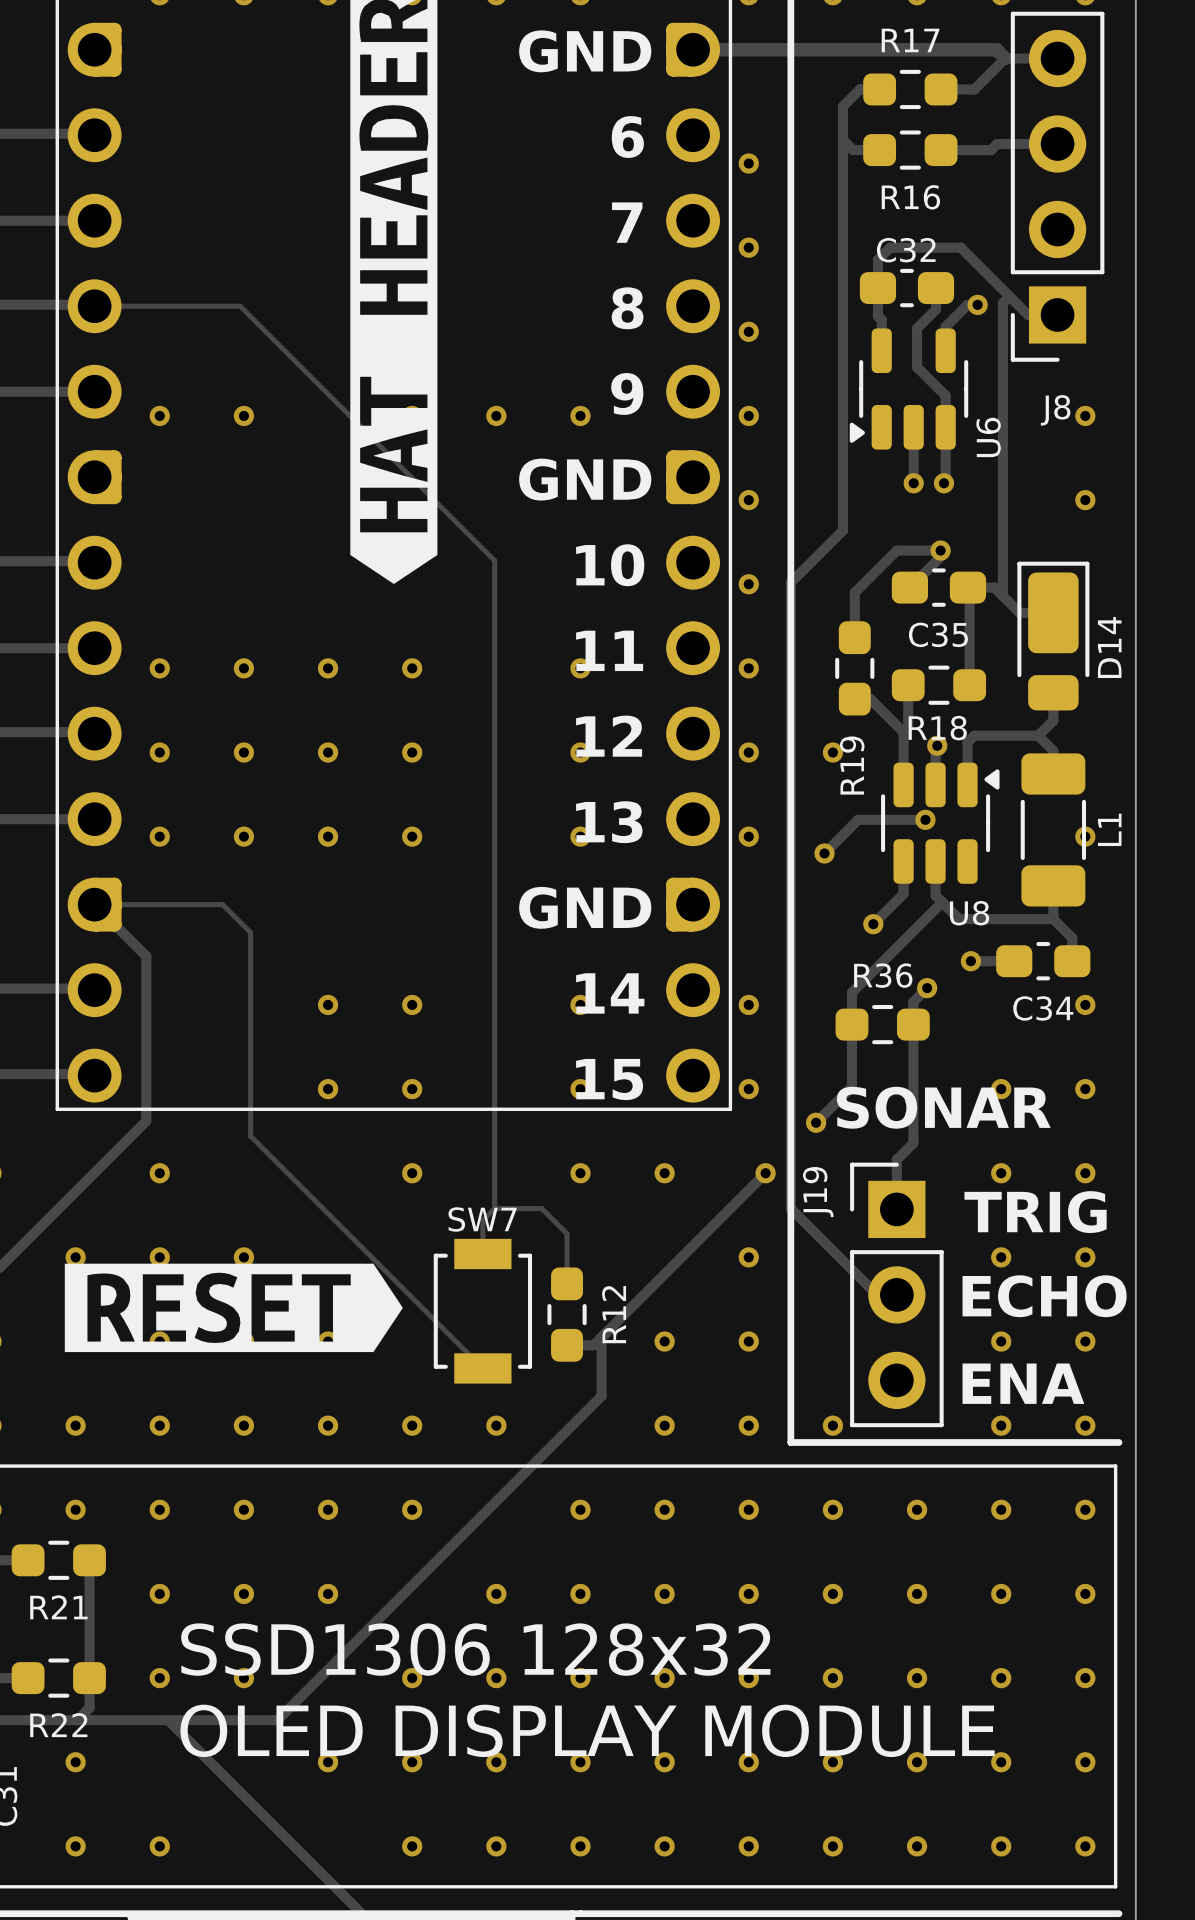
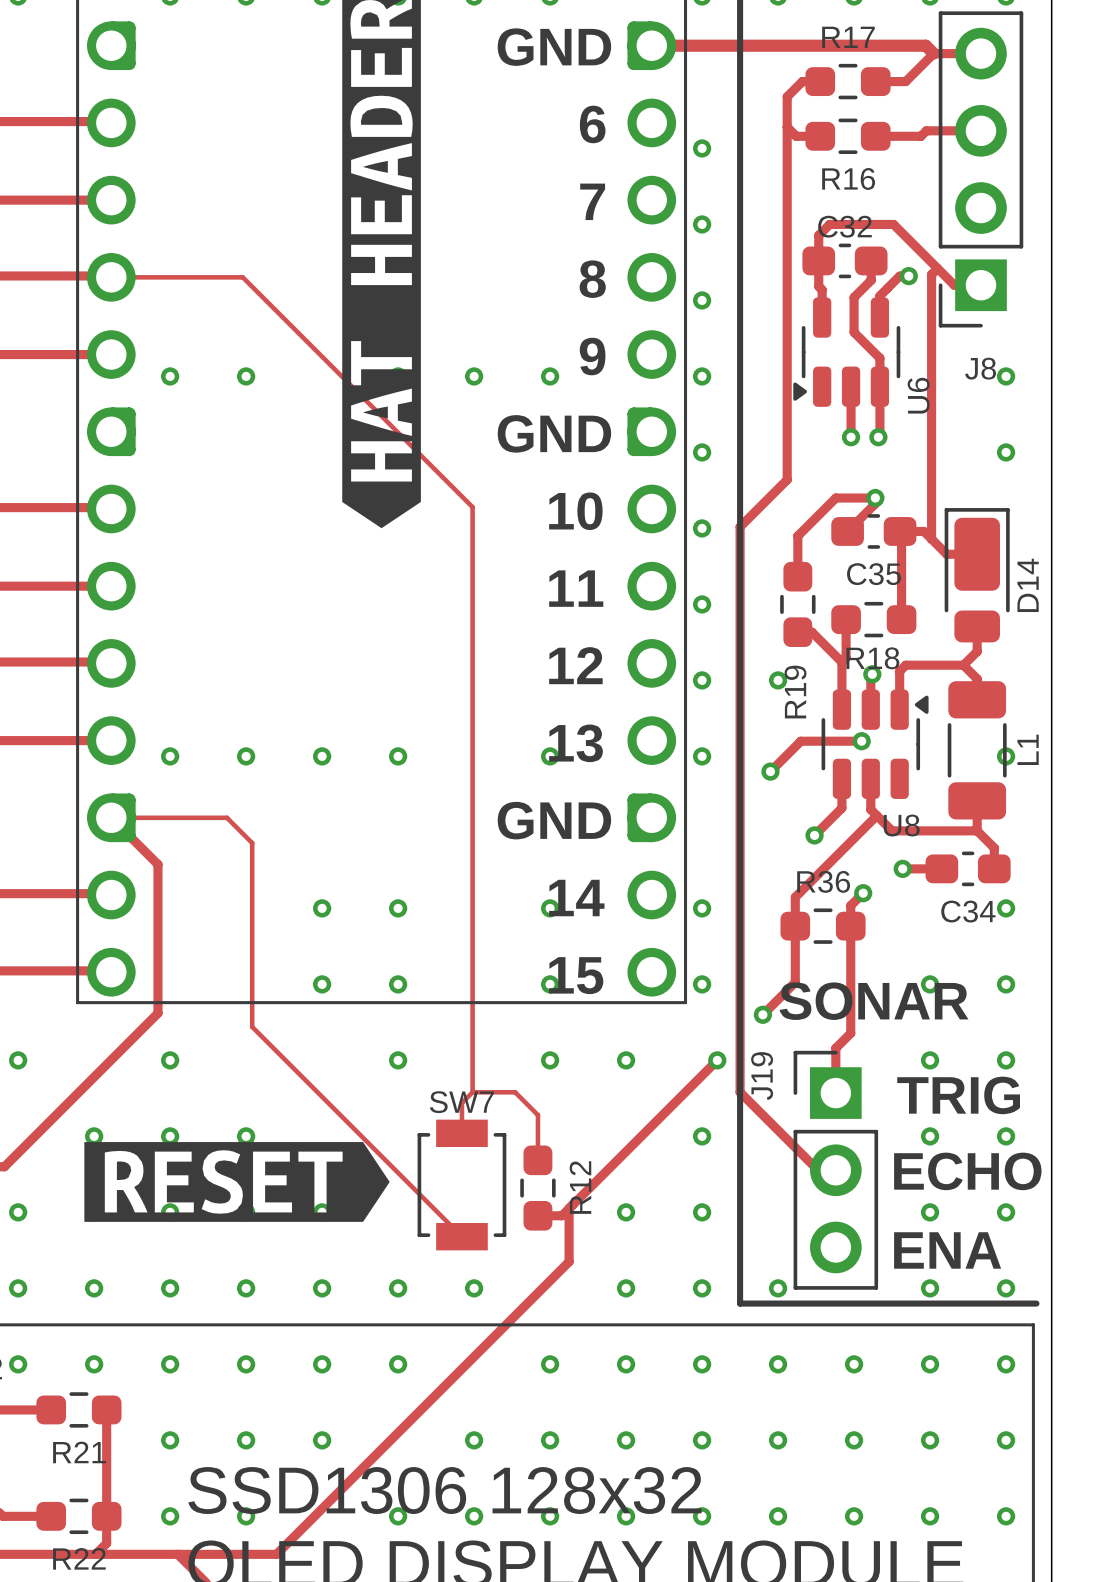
via: (159, 668) -> none
via: (243, 668) -> none
via: (328, 668) -> none
via: (412, 668) -> none
via: (580, 668) -> none
via: (159, 752) -> none
via: (243, 752) -> none
via: (328, 752) -> none
via: (412, 752) -> none
via: (580, 752) -> none

